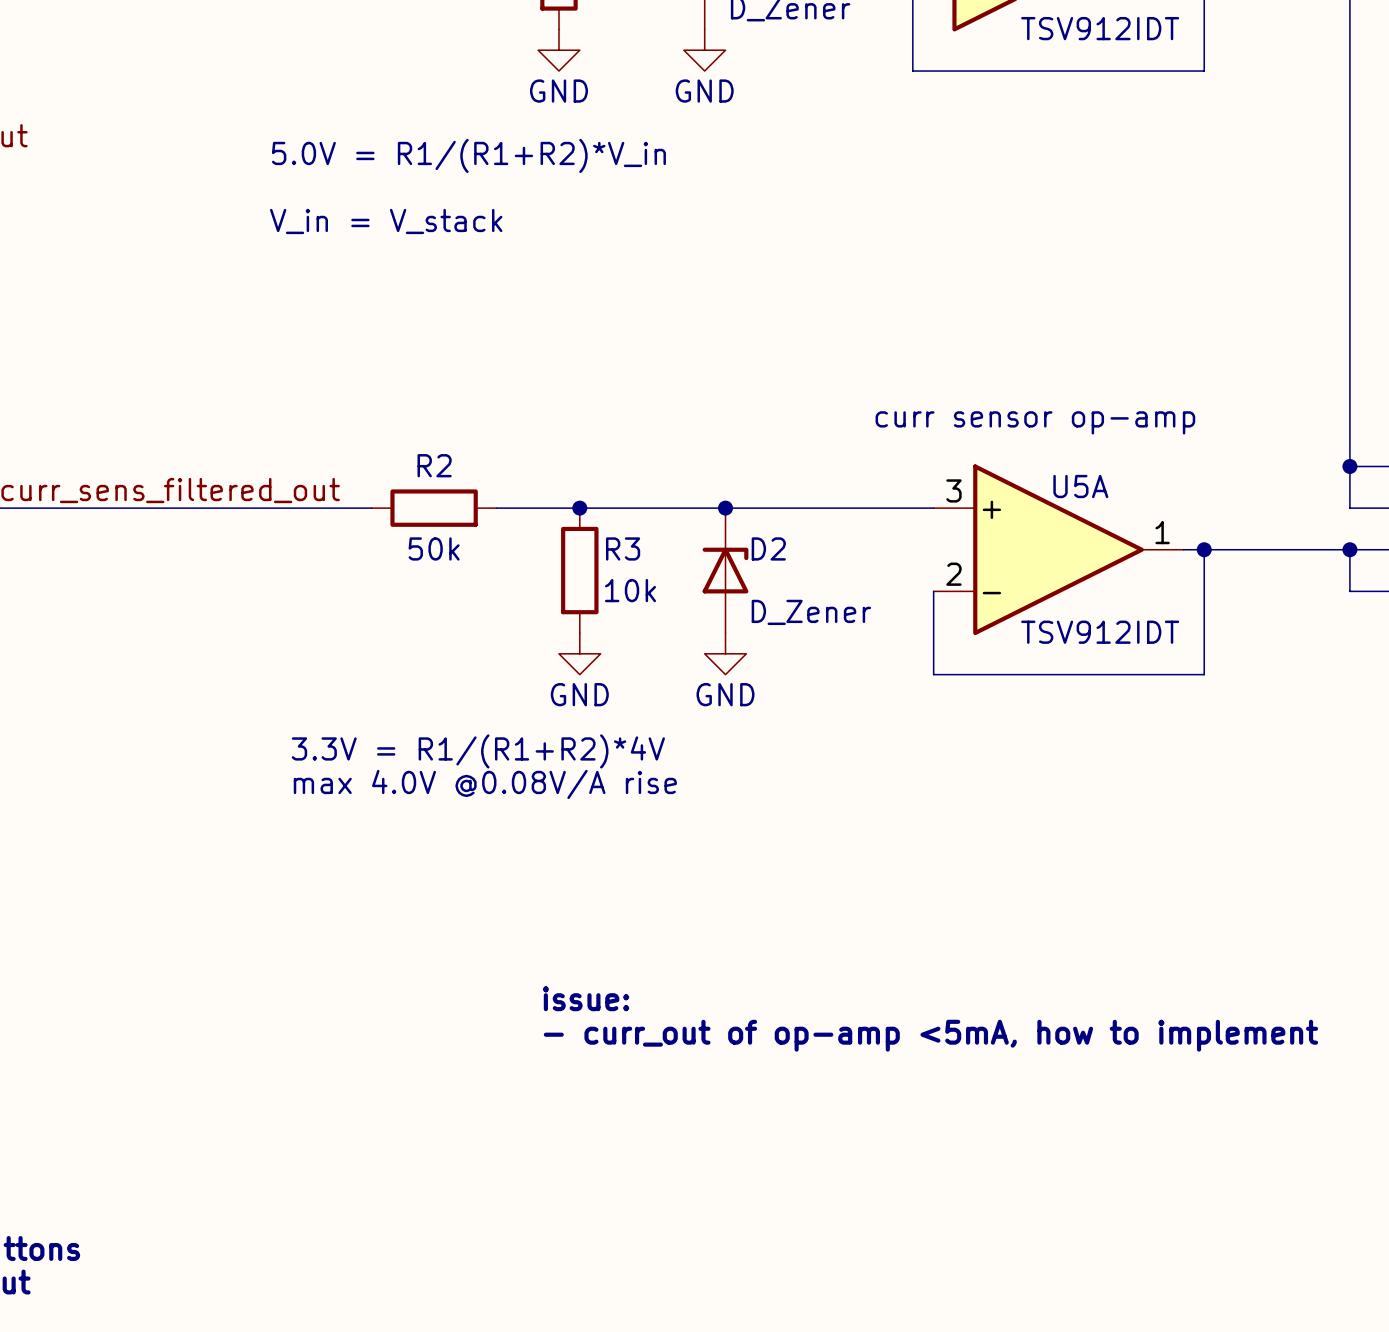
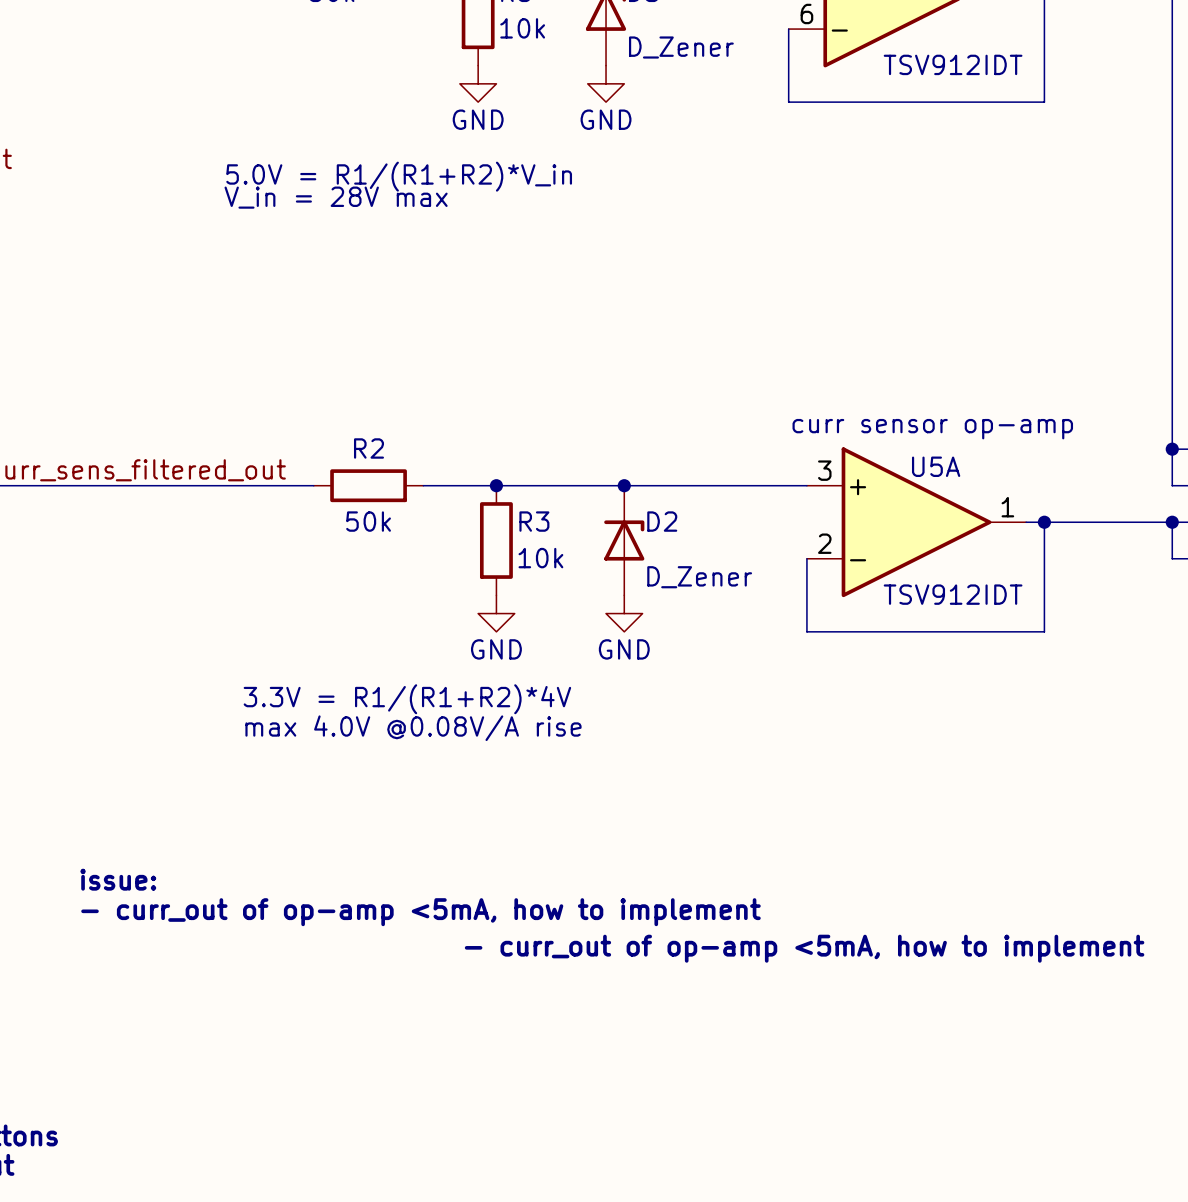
text: V_in = V_stack (386, 221) -> V_in = 28V max (336, 197)
text position: curr sensor op-amp (1035, 422) -> curr sensor op-amp (932, 429)
text: none -> issue: (118, 879)
text: none -> - curr_out of op-amp <5mA, how to implement (420, 912)
text: issue: (586, 998) -> none

